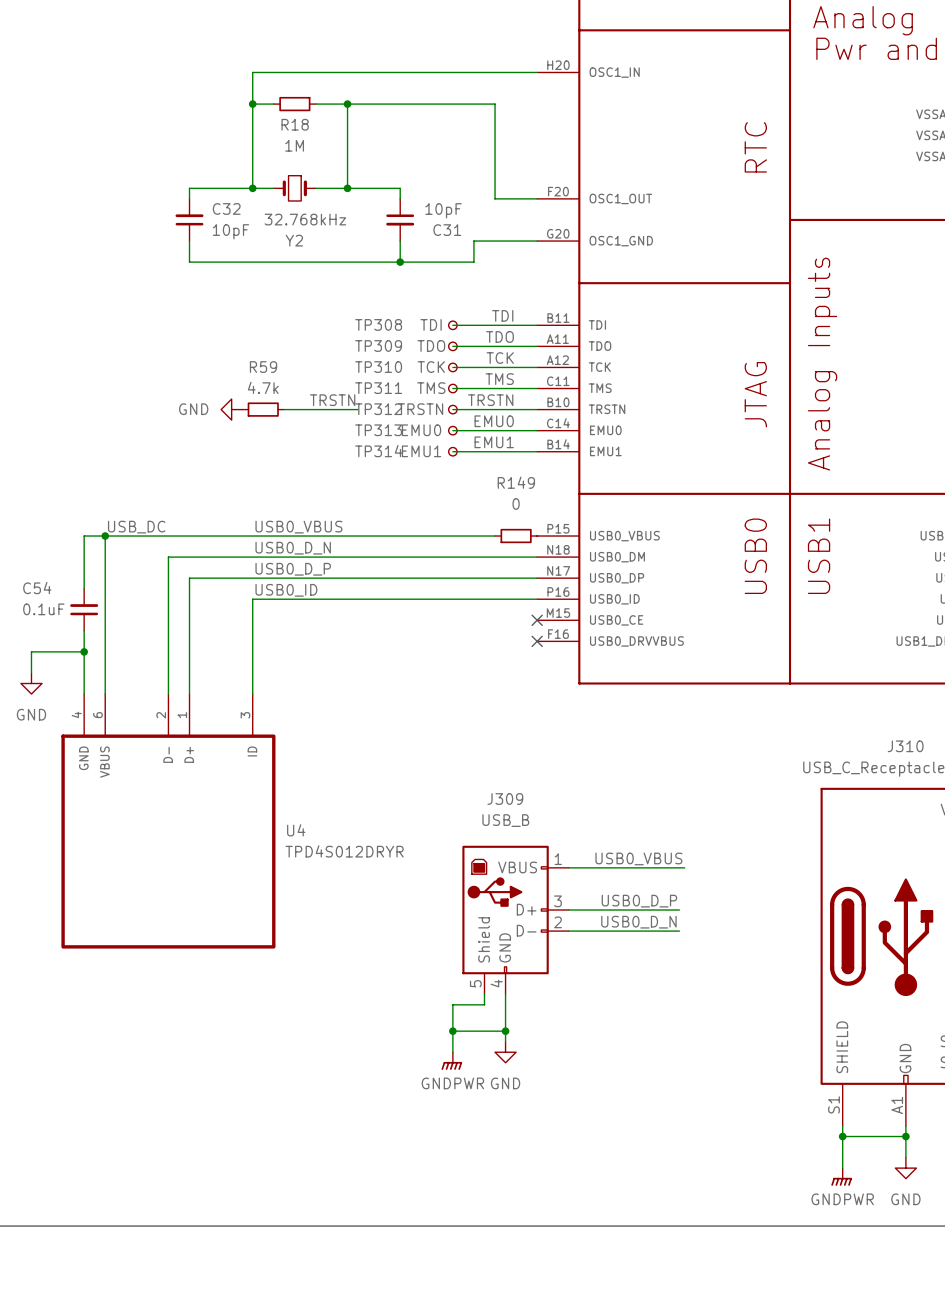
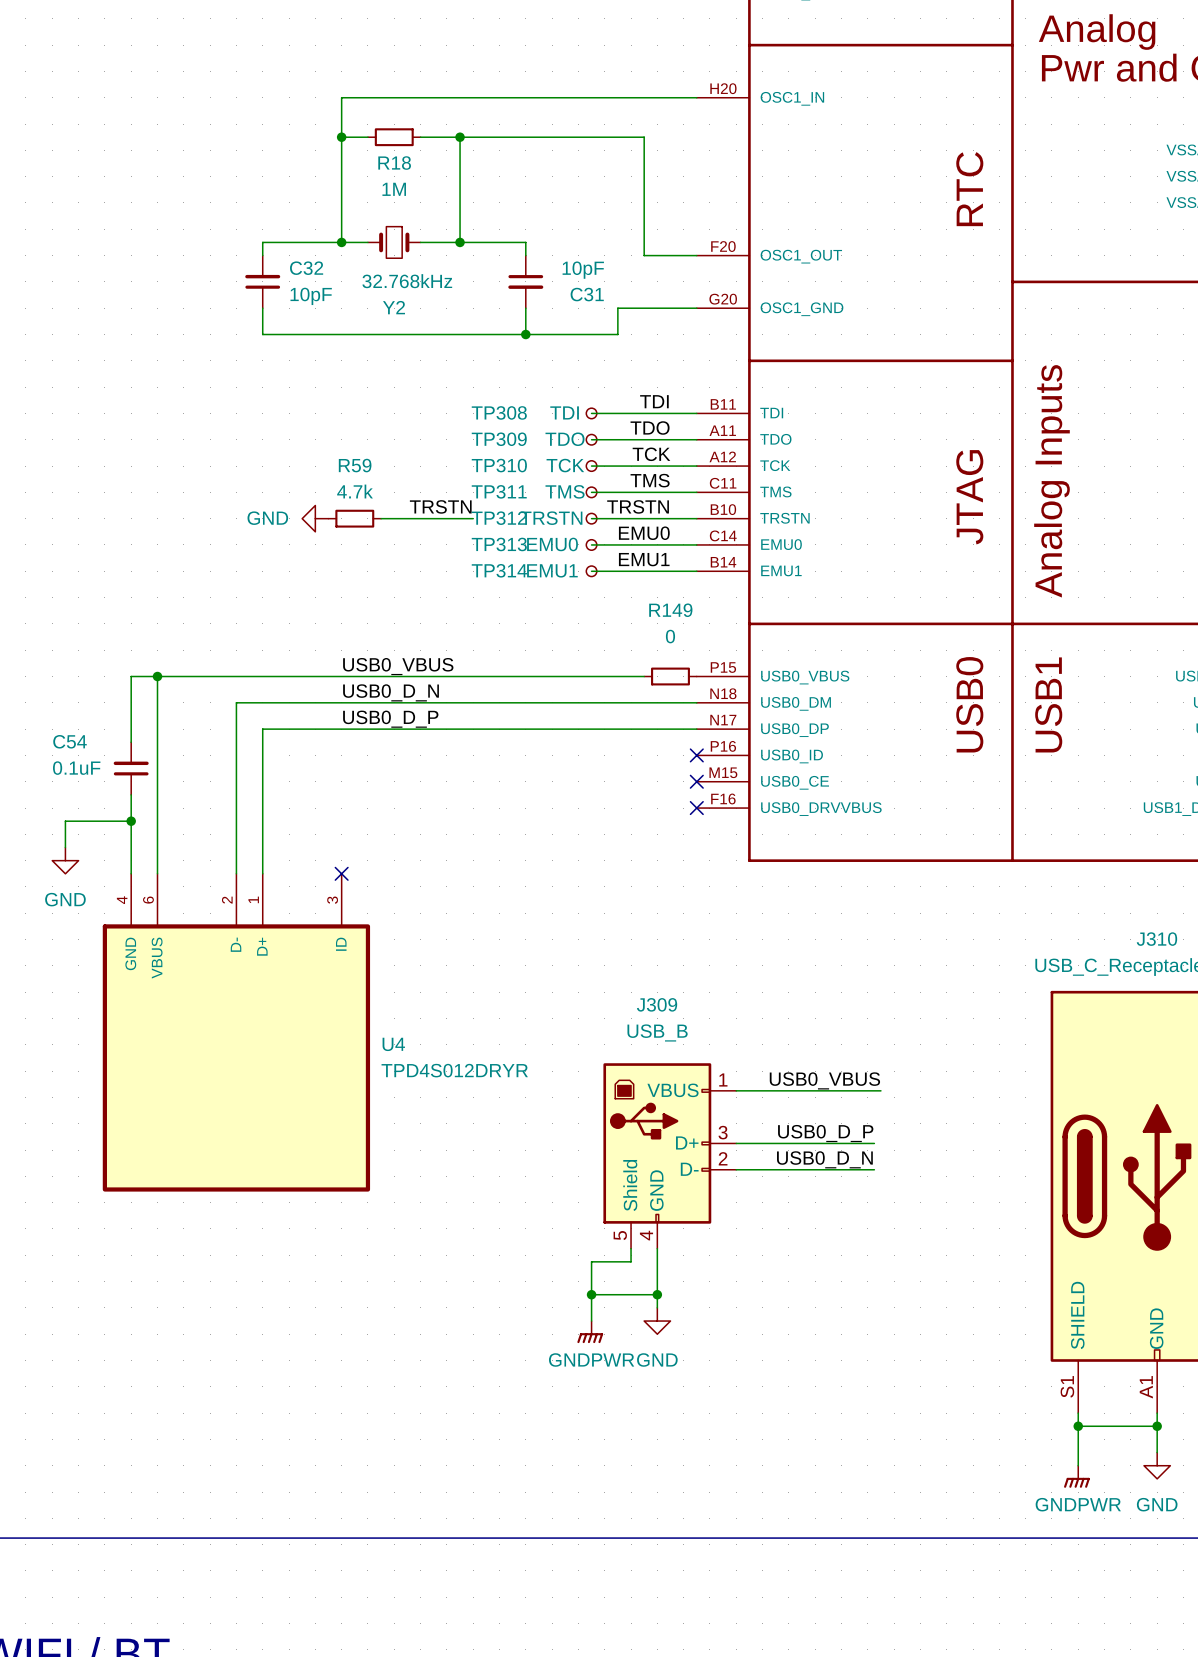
label: USB_DC (136, 527) -> none
label: USB0_ID (286, 590) -> none
wire: (537, 599) (252, 599) (252, 694) -> none
no-connect mark: none -> (696, 755)
no-connect mark: none -> (341, 873)

